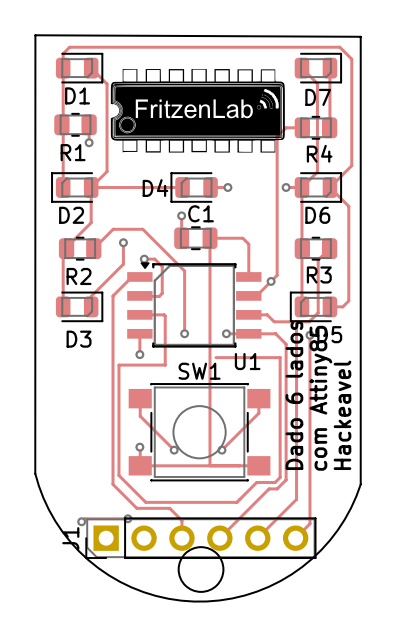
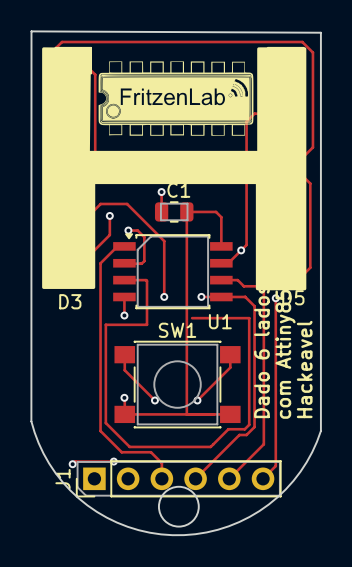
drawing: none -> [42, 47, 307, 291]

